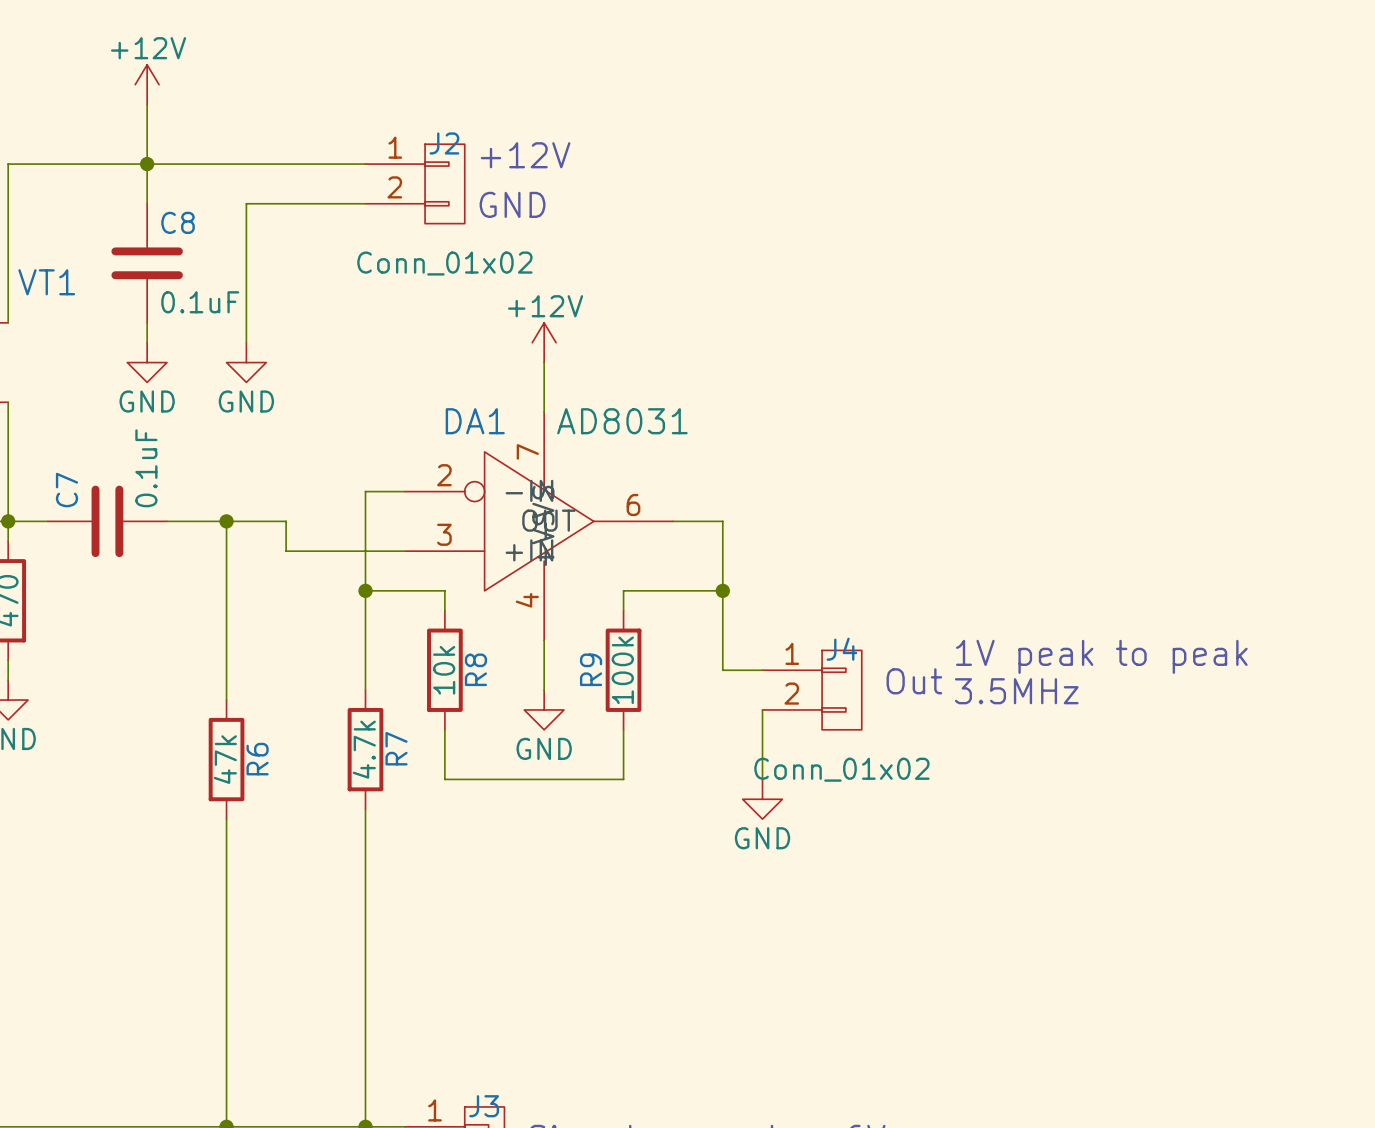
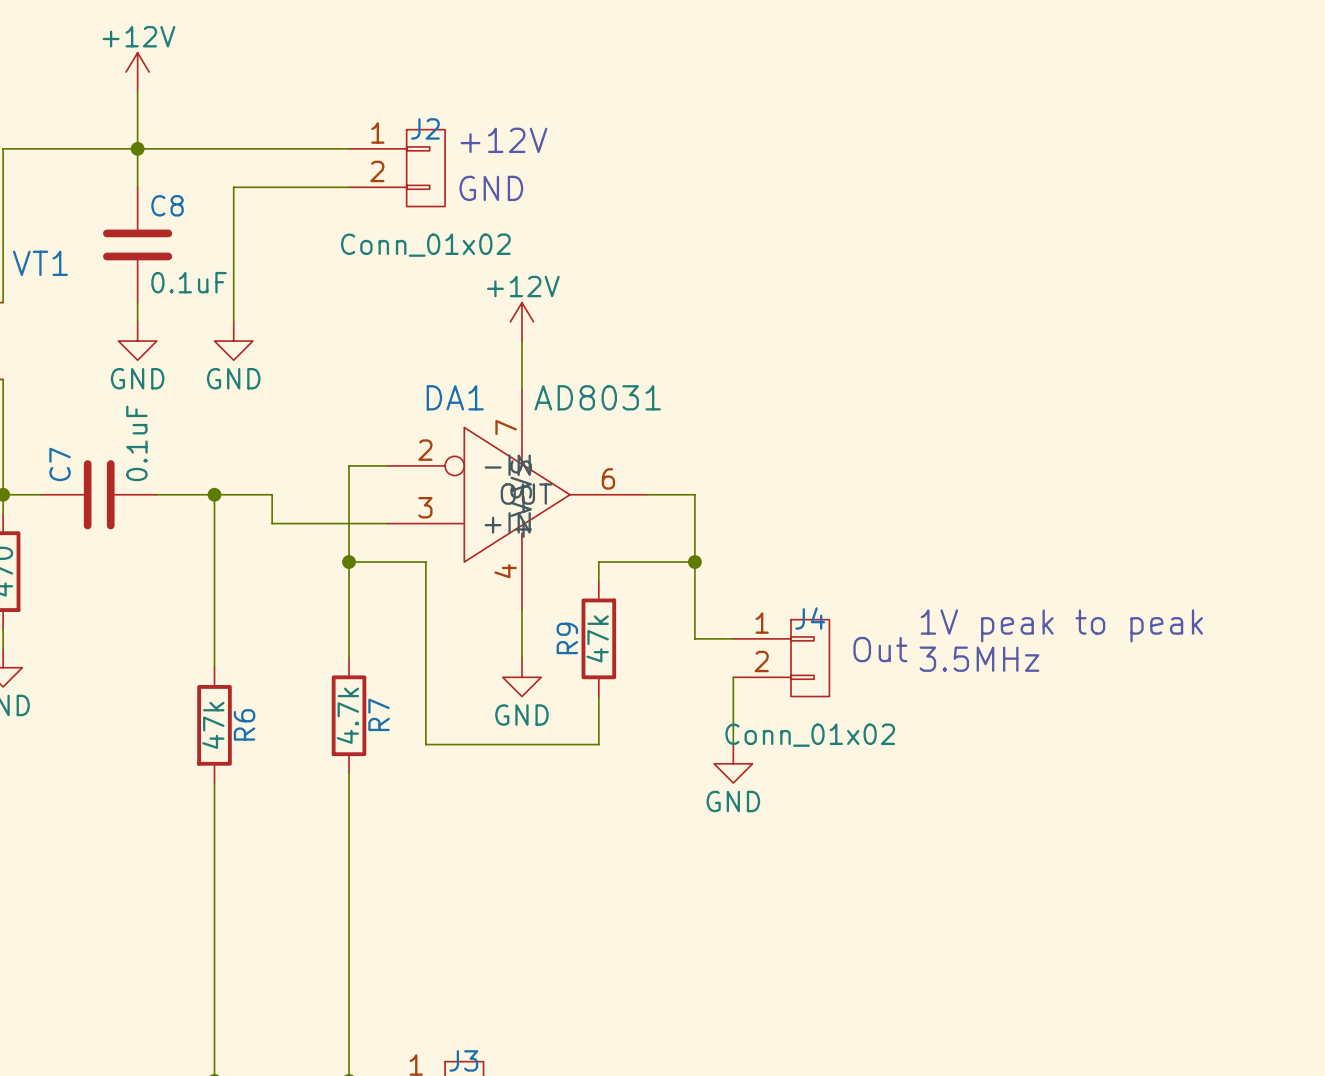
wire: none -> (425, 581) (425, 696)
R8: 10k (444, 670) -> none
R9 value: 100k (622, 670) -> 47k (597, 638)

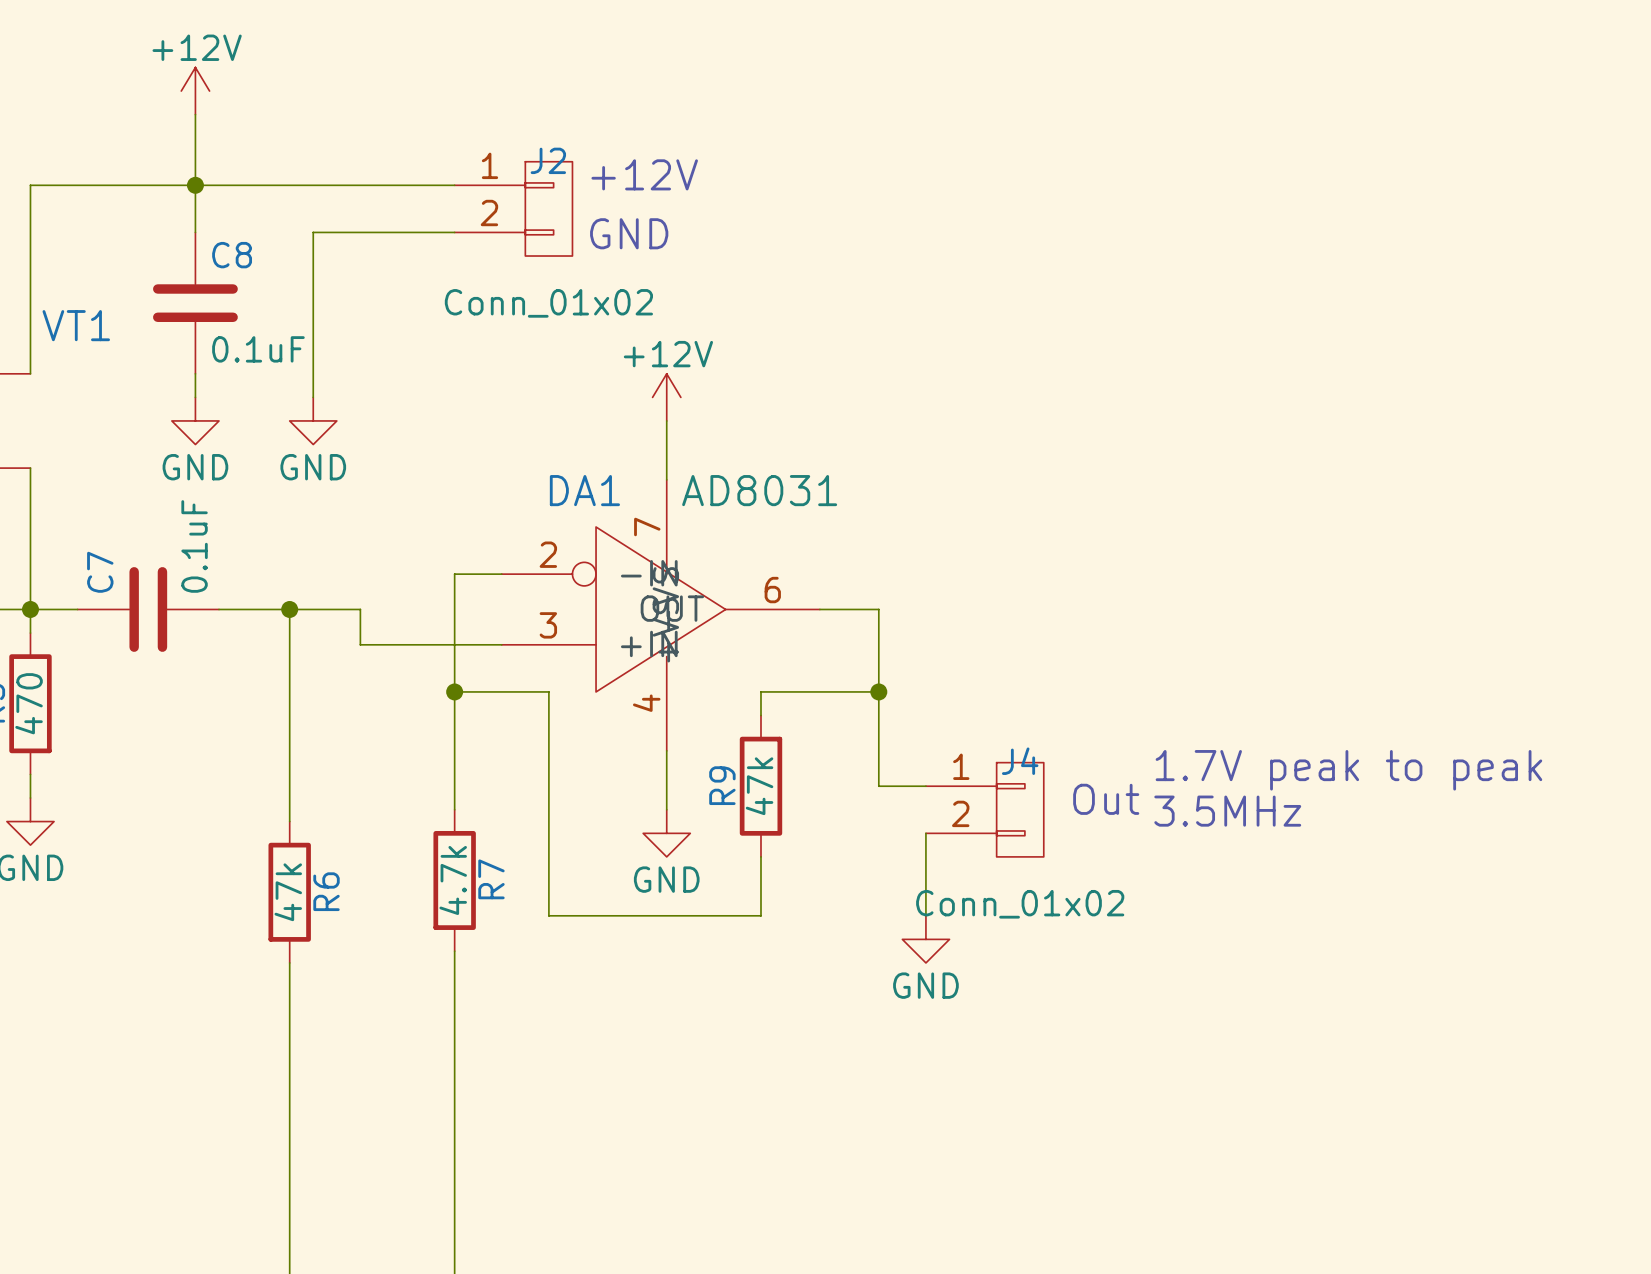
text: 1V peak to peak (1061, 625) -> 1.7V peak to peak (1348, 770)

